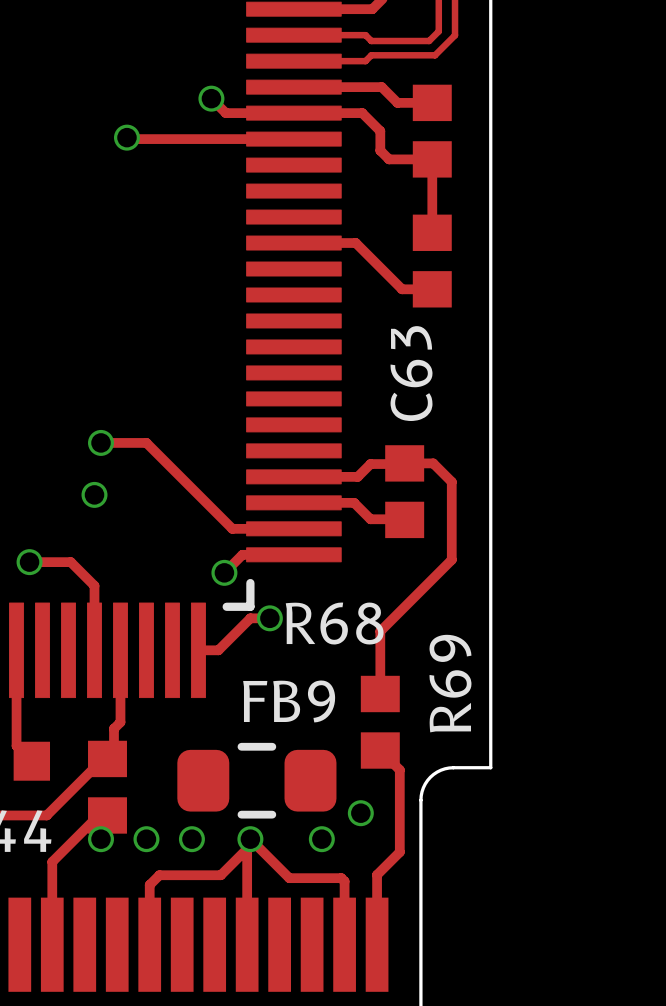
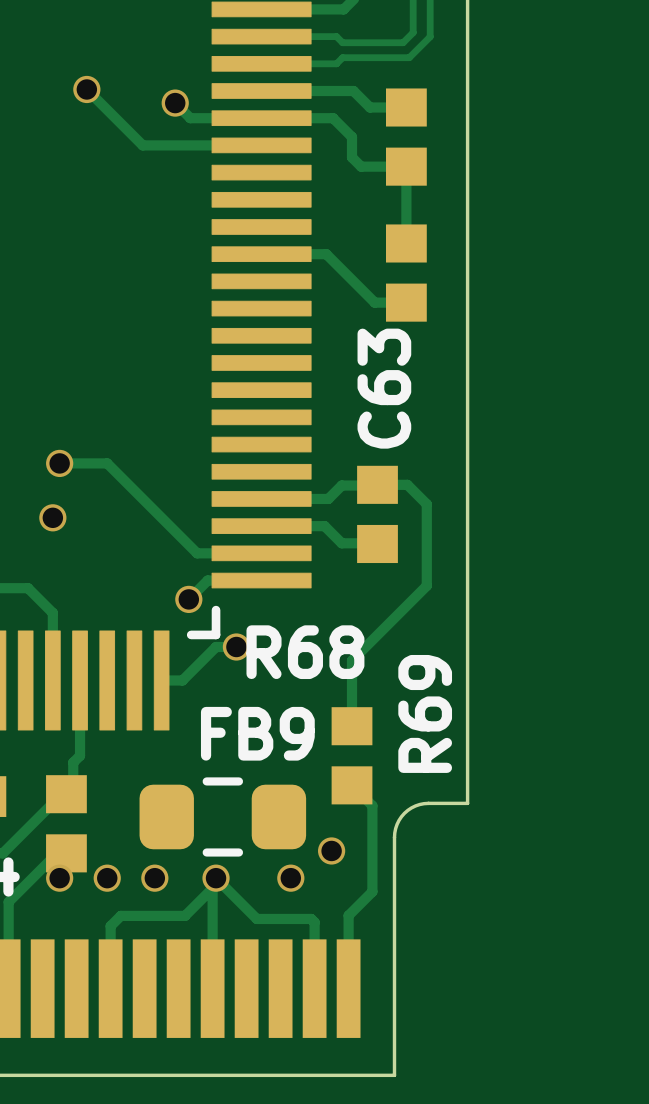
track: (126, 137) (180, 139) -> (86, 89) (142, 145)
via position: (126, 137) -> (86, 89)

